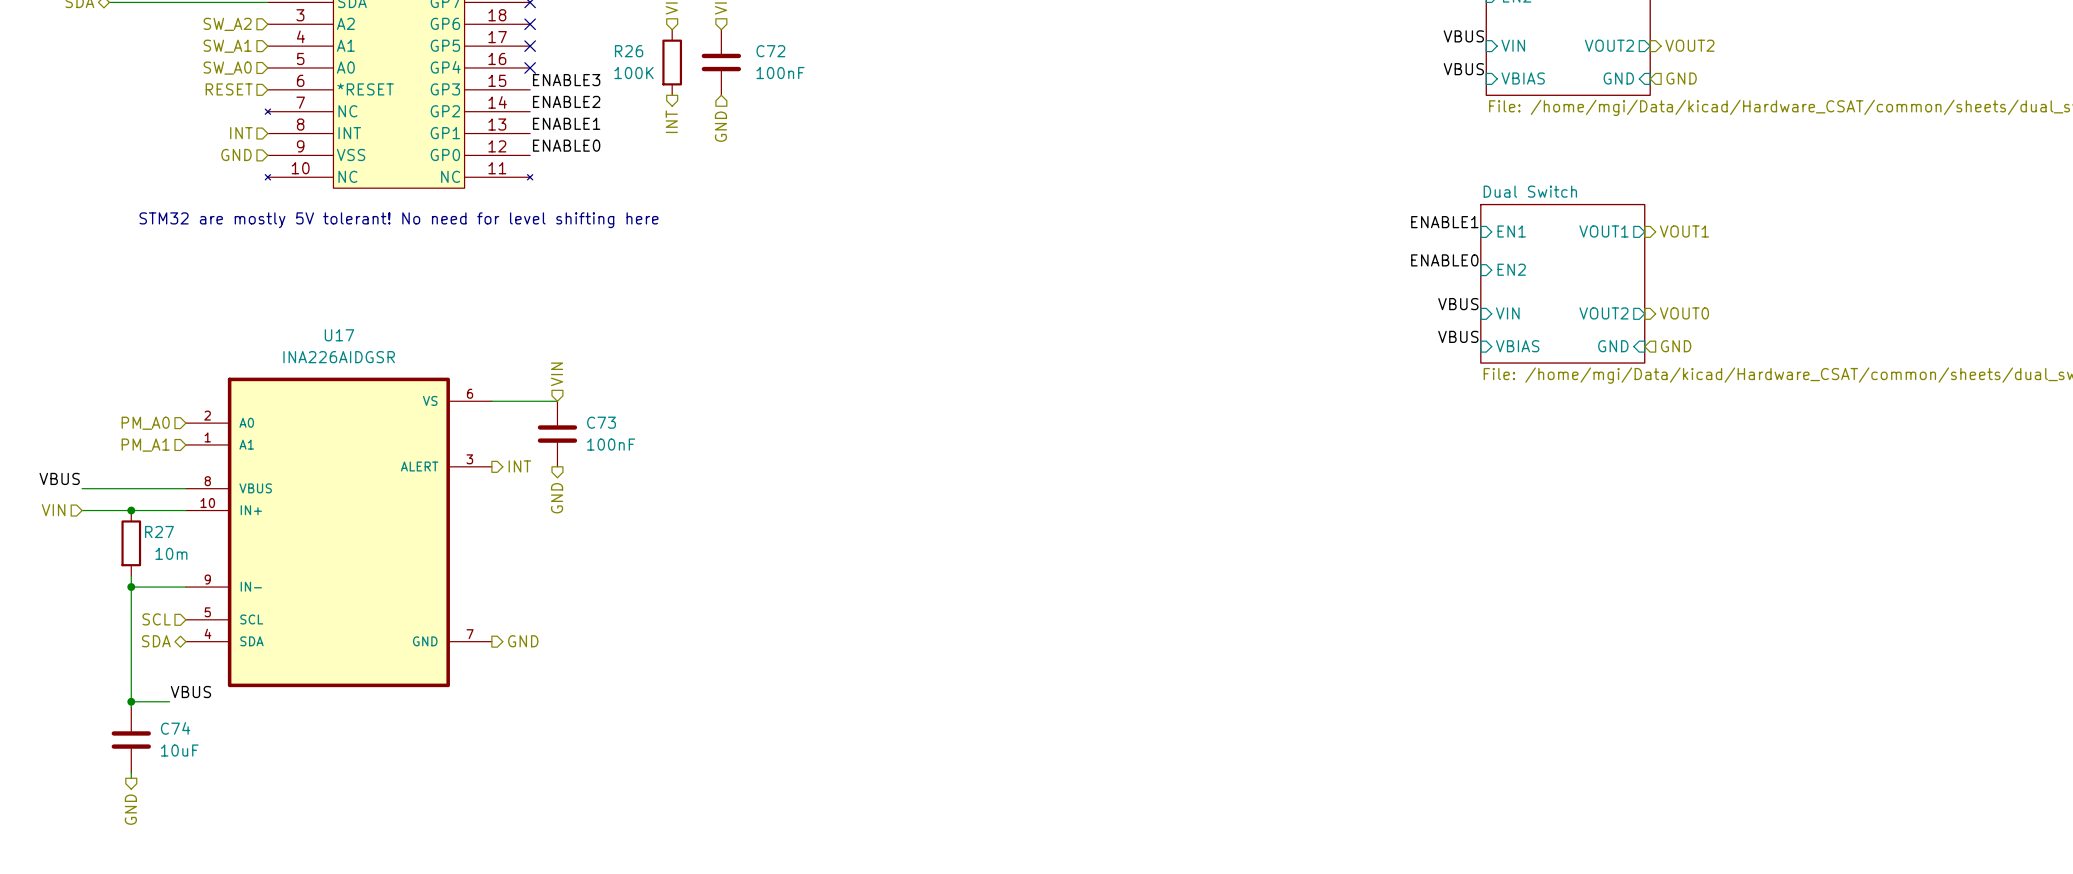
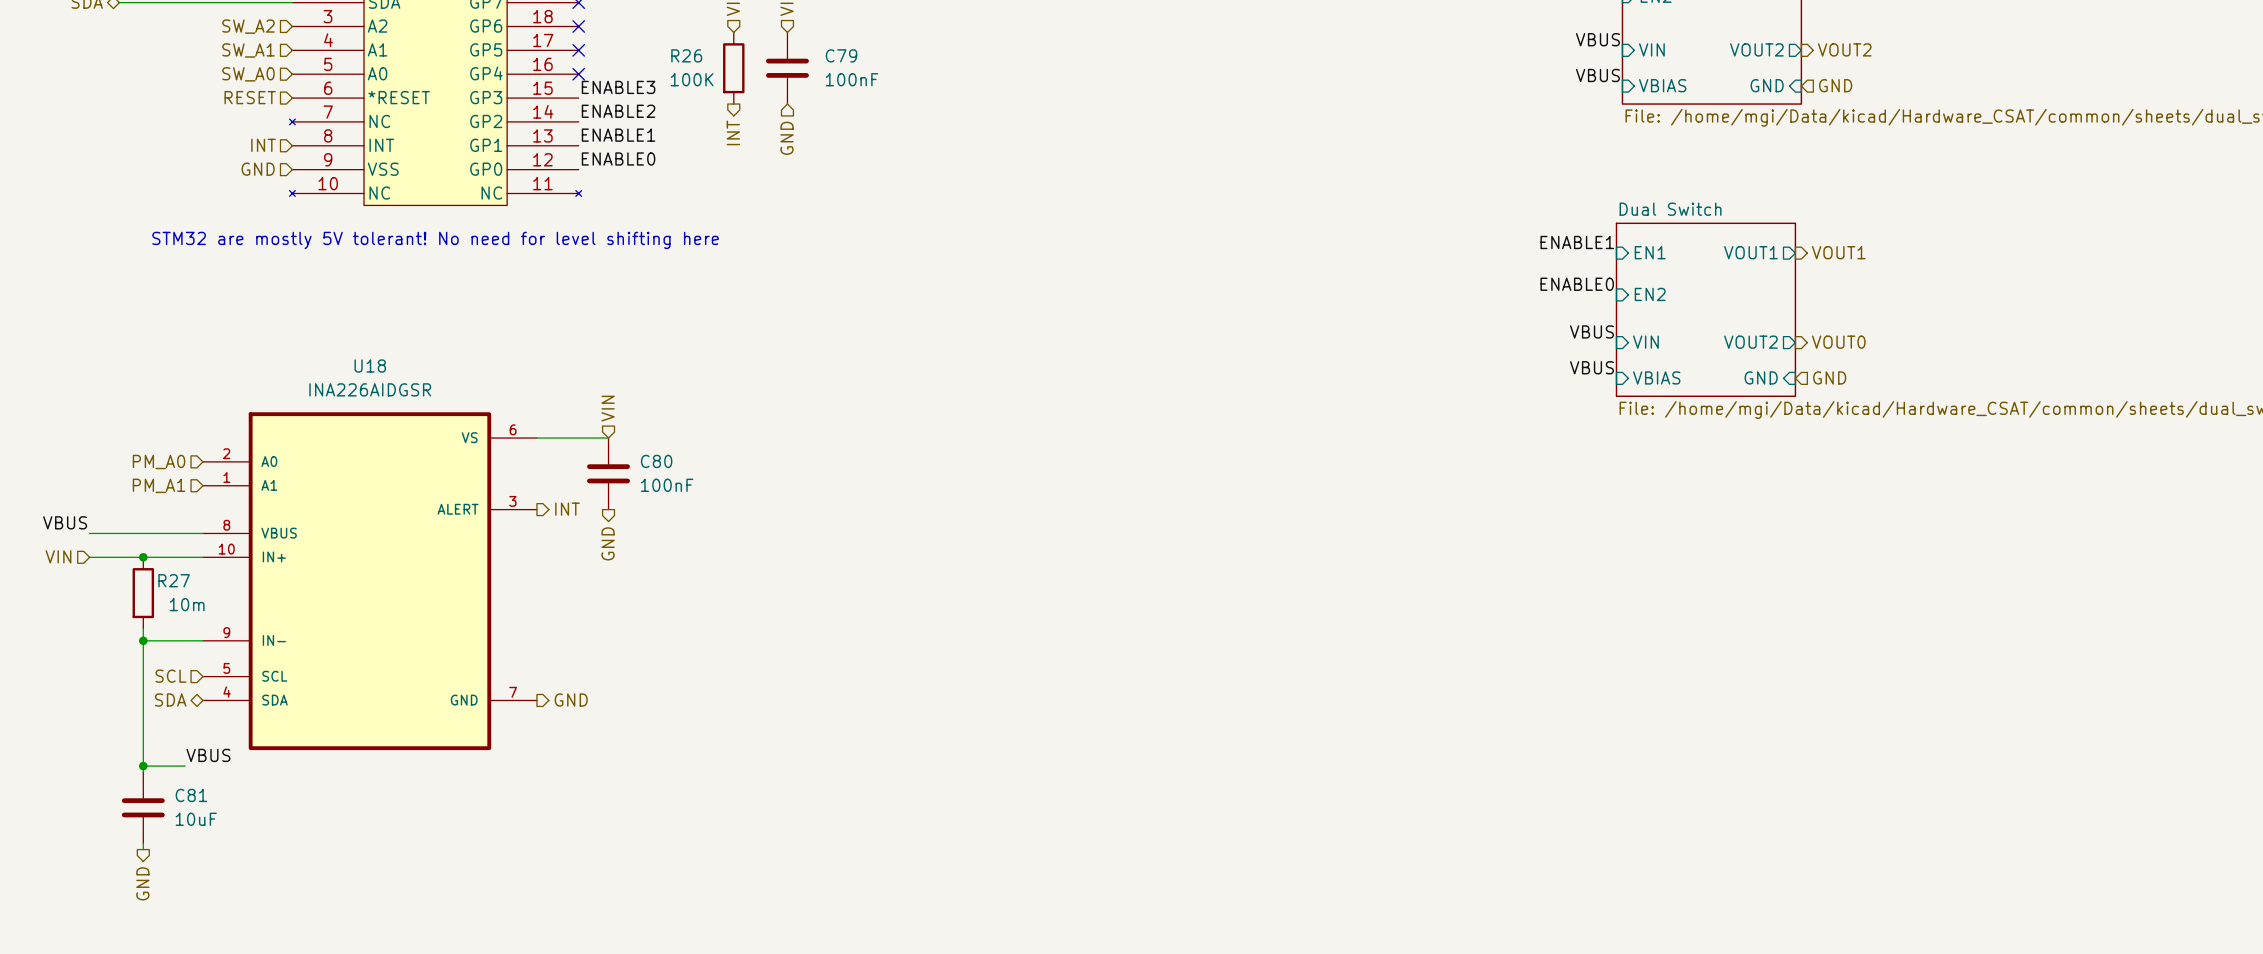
C72 name: C72 (770, 51) -> C79 (841, 55)
U17 name: U17 (339, 335) -> U18 (370, 366)
C73 name: C73 (601, 422) -> C80 (656, 461)
C74 name: C74 (175, 728) -> C81 (191, 795)

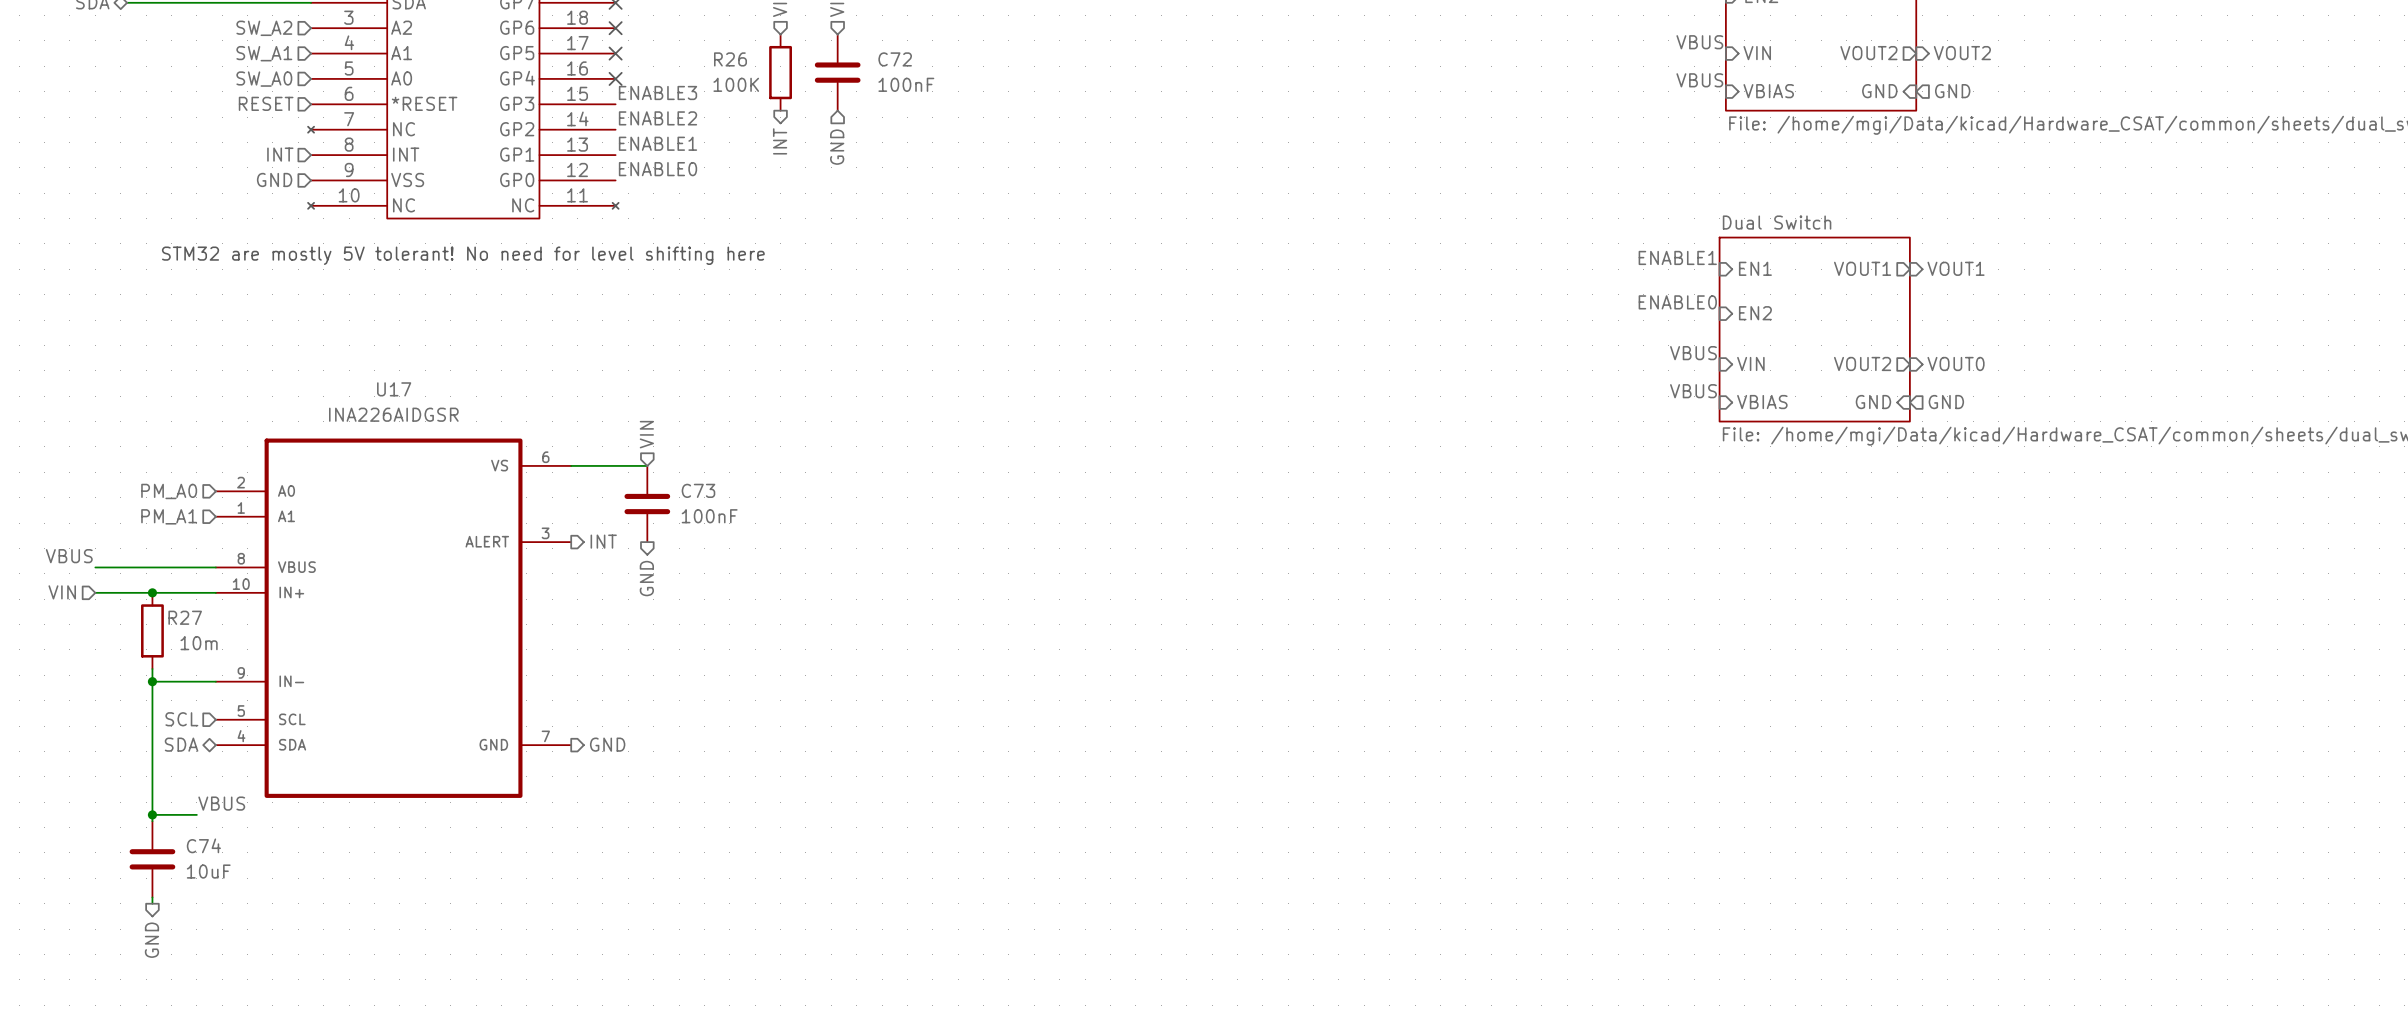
C79 name: C79 (841, 55) -> C72 (895, 59)
U18 name: U18 (370, 366) -> U17 (394, 389)
C80 name: C80 (656, 461) -> C73 (698, 490)
C81 name: C81 (191, 795) -> C74 (203, 845)

